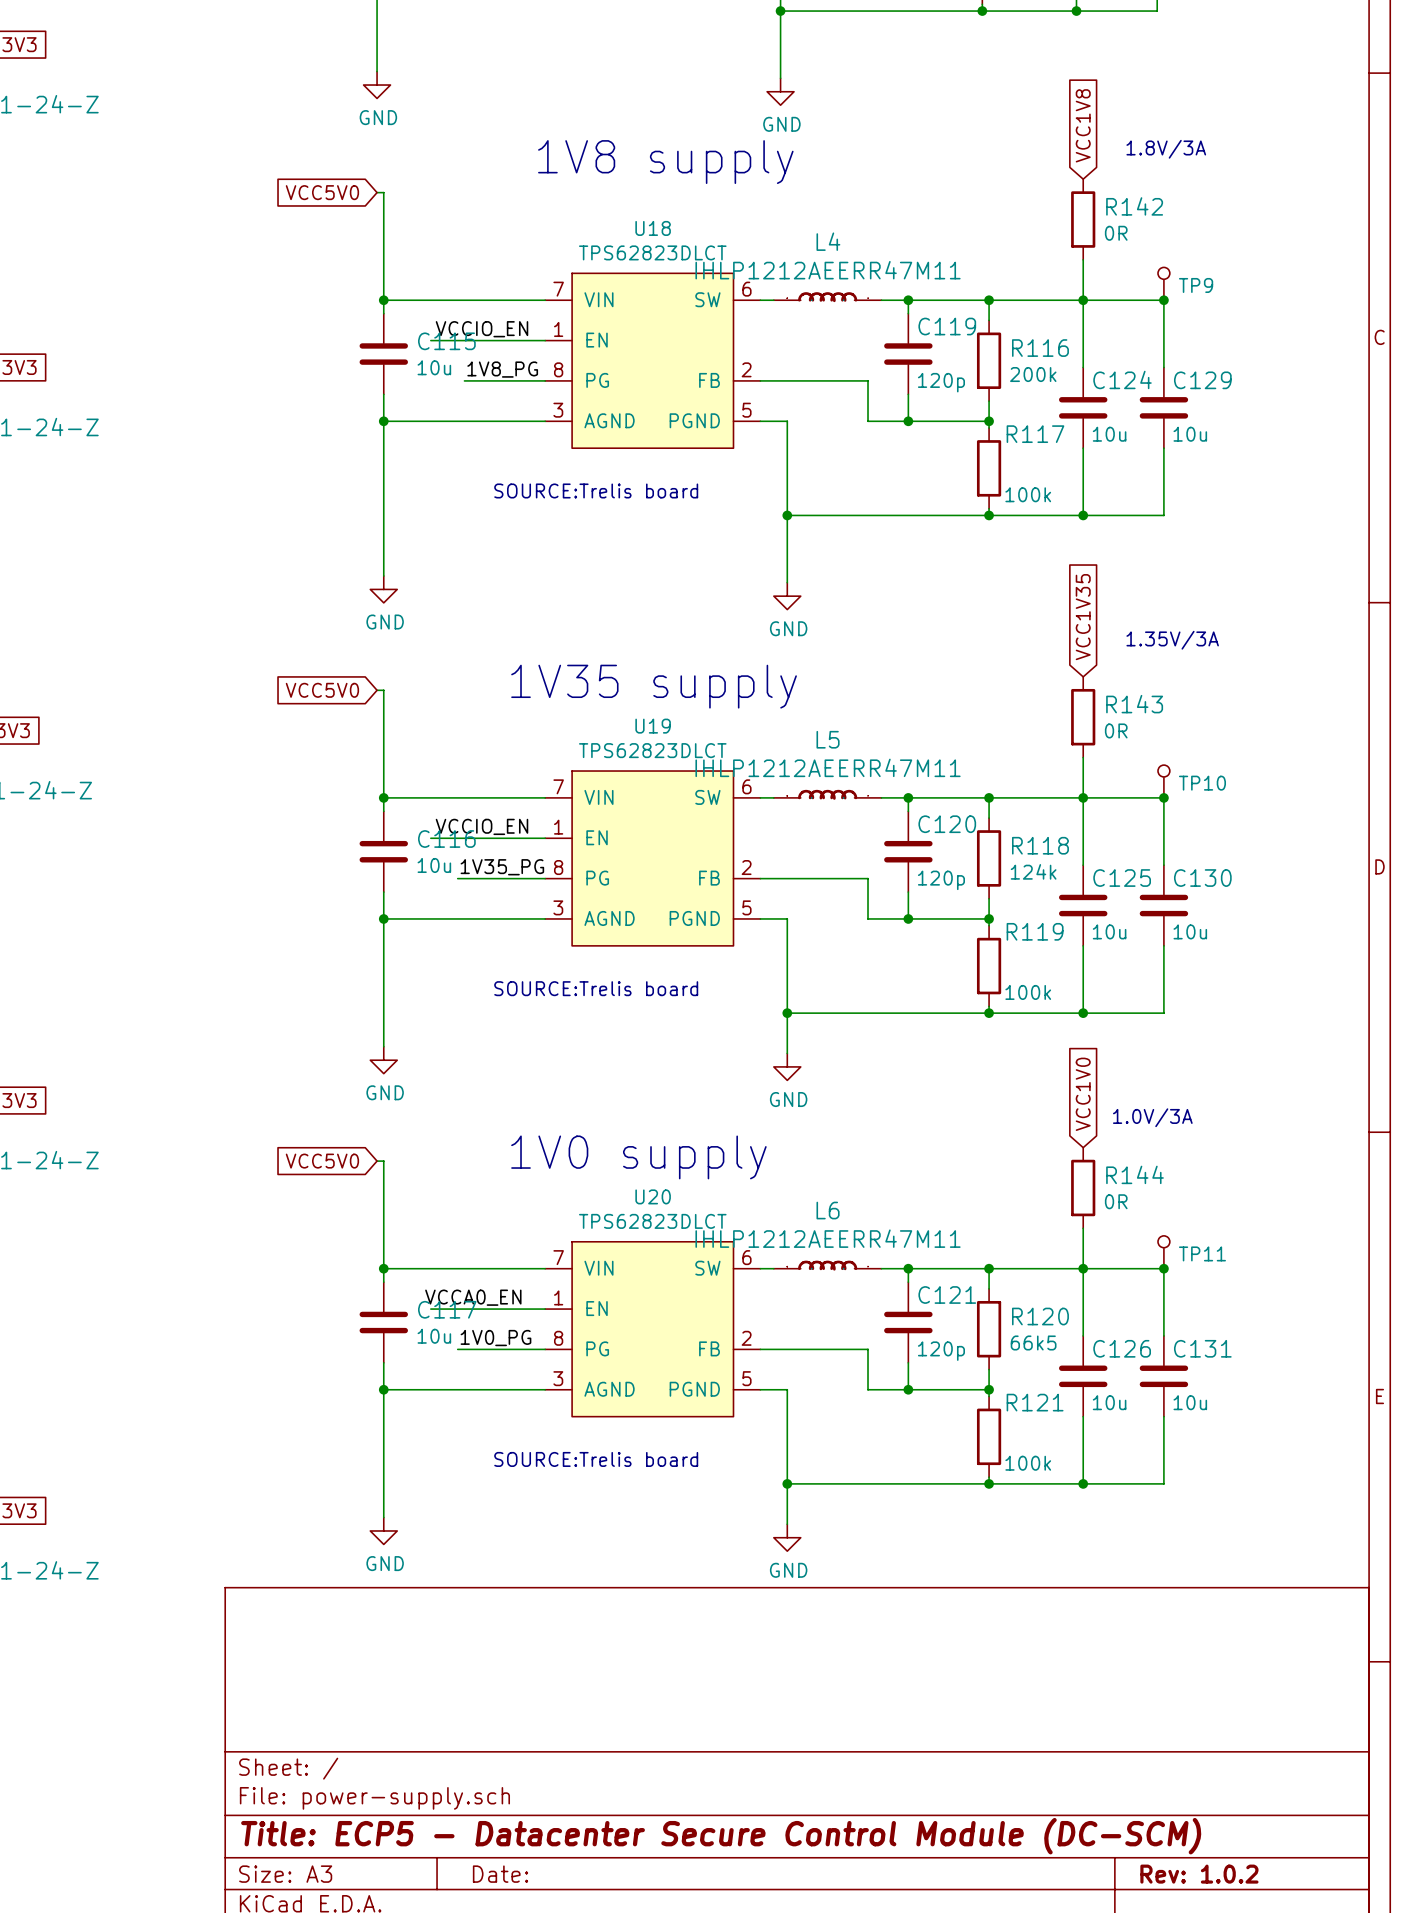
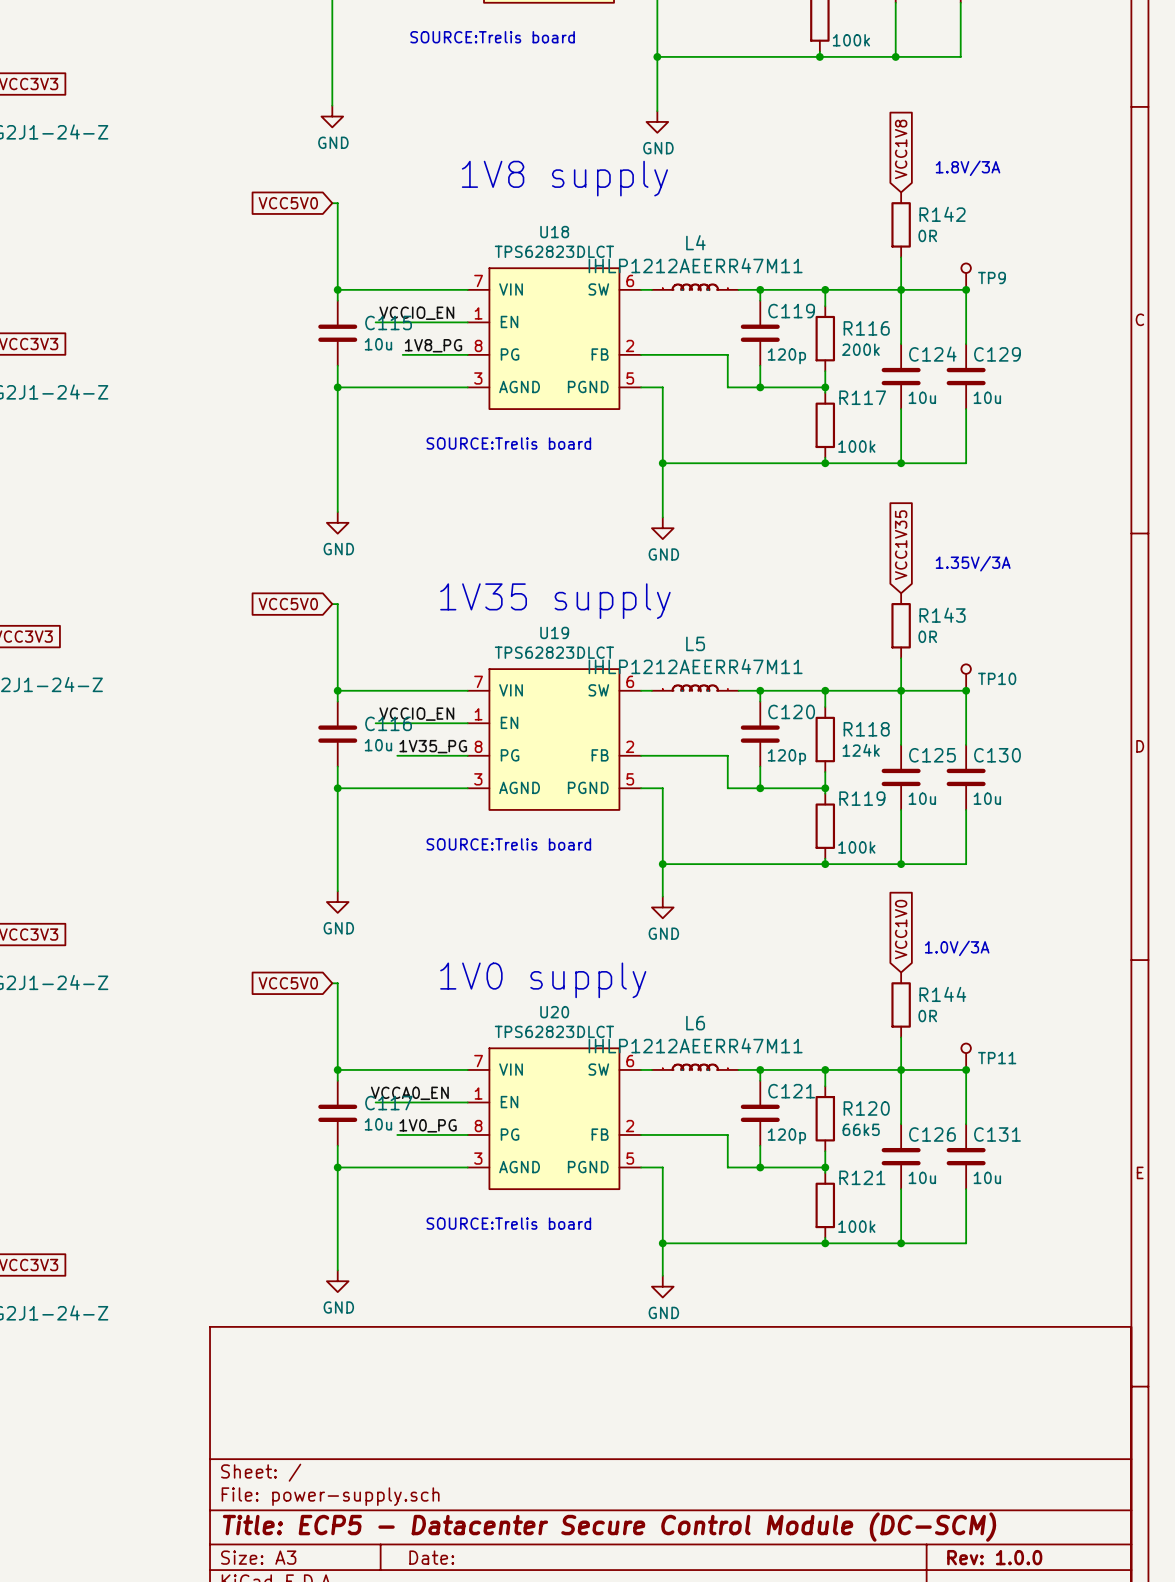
title block: Rev: 1.0.2 (1199, 1874) -> Rev: 1.0.0 (994, 1557)

